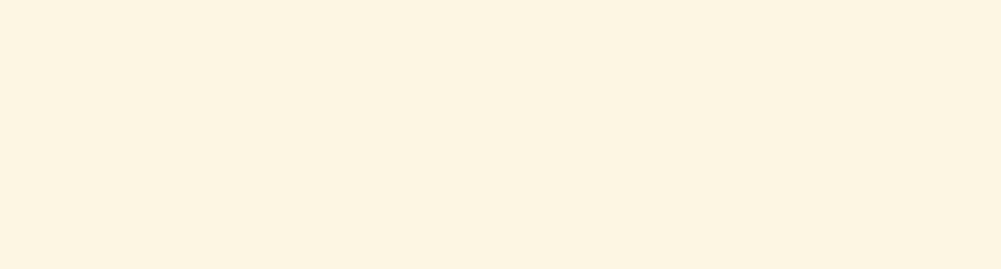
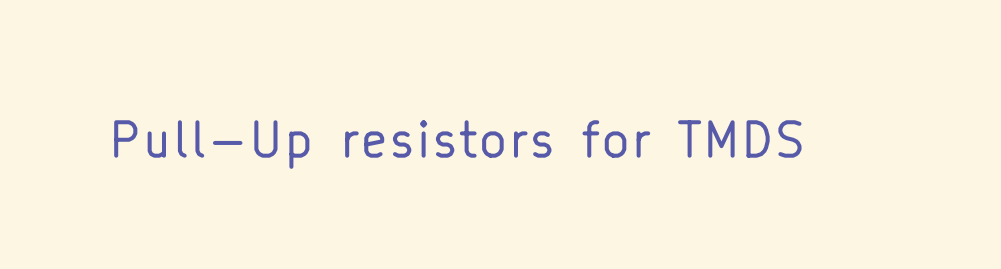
text: none -> Pull-Up resistors for TMDS (457, 144)

